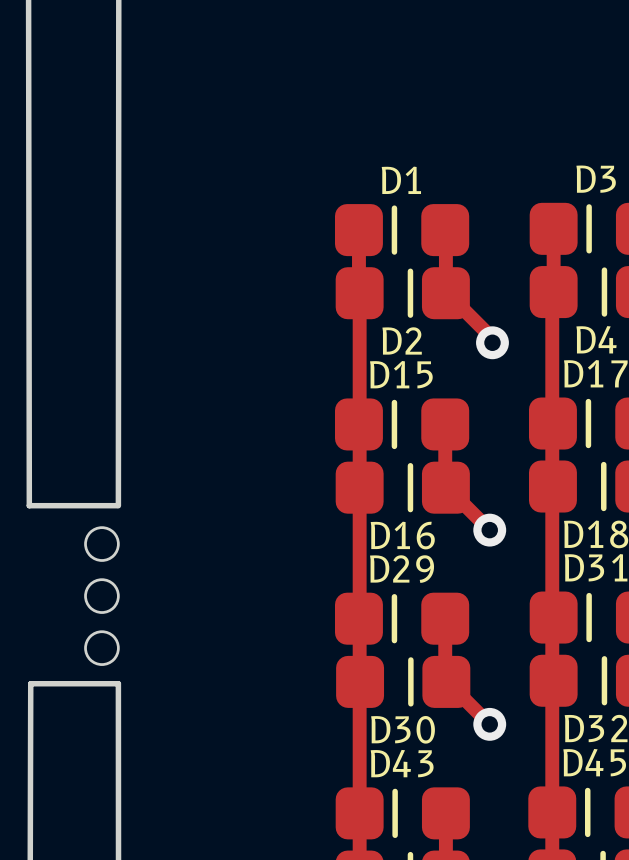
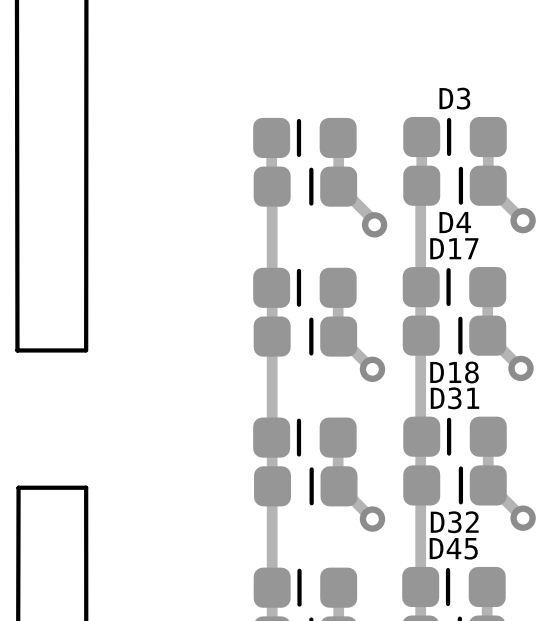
D1 name: D1 (401, 180) -> none
D2 name: D2 (402, 340) -> none
D15 name: D15 (401, 374) -> none
round board edge: [84, 526, 120, 562] -> none
D16 name: D16 (402, 535) -> none
D29 name: D29 (402, 569) -> none
round board edge: [84, 578, 120, 614] -> none
round board edge: [84, 630, 120, 666] -> none
D30 name: D30 (403, 729) -> none
D43 name: D43 (402, 763) -> none

